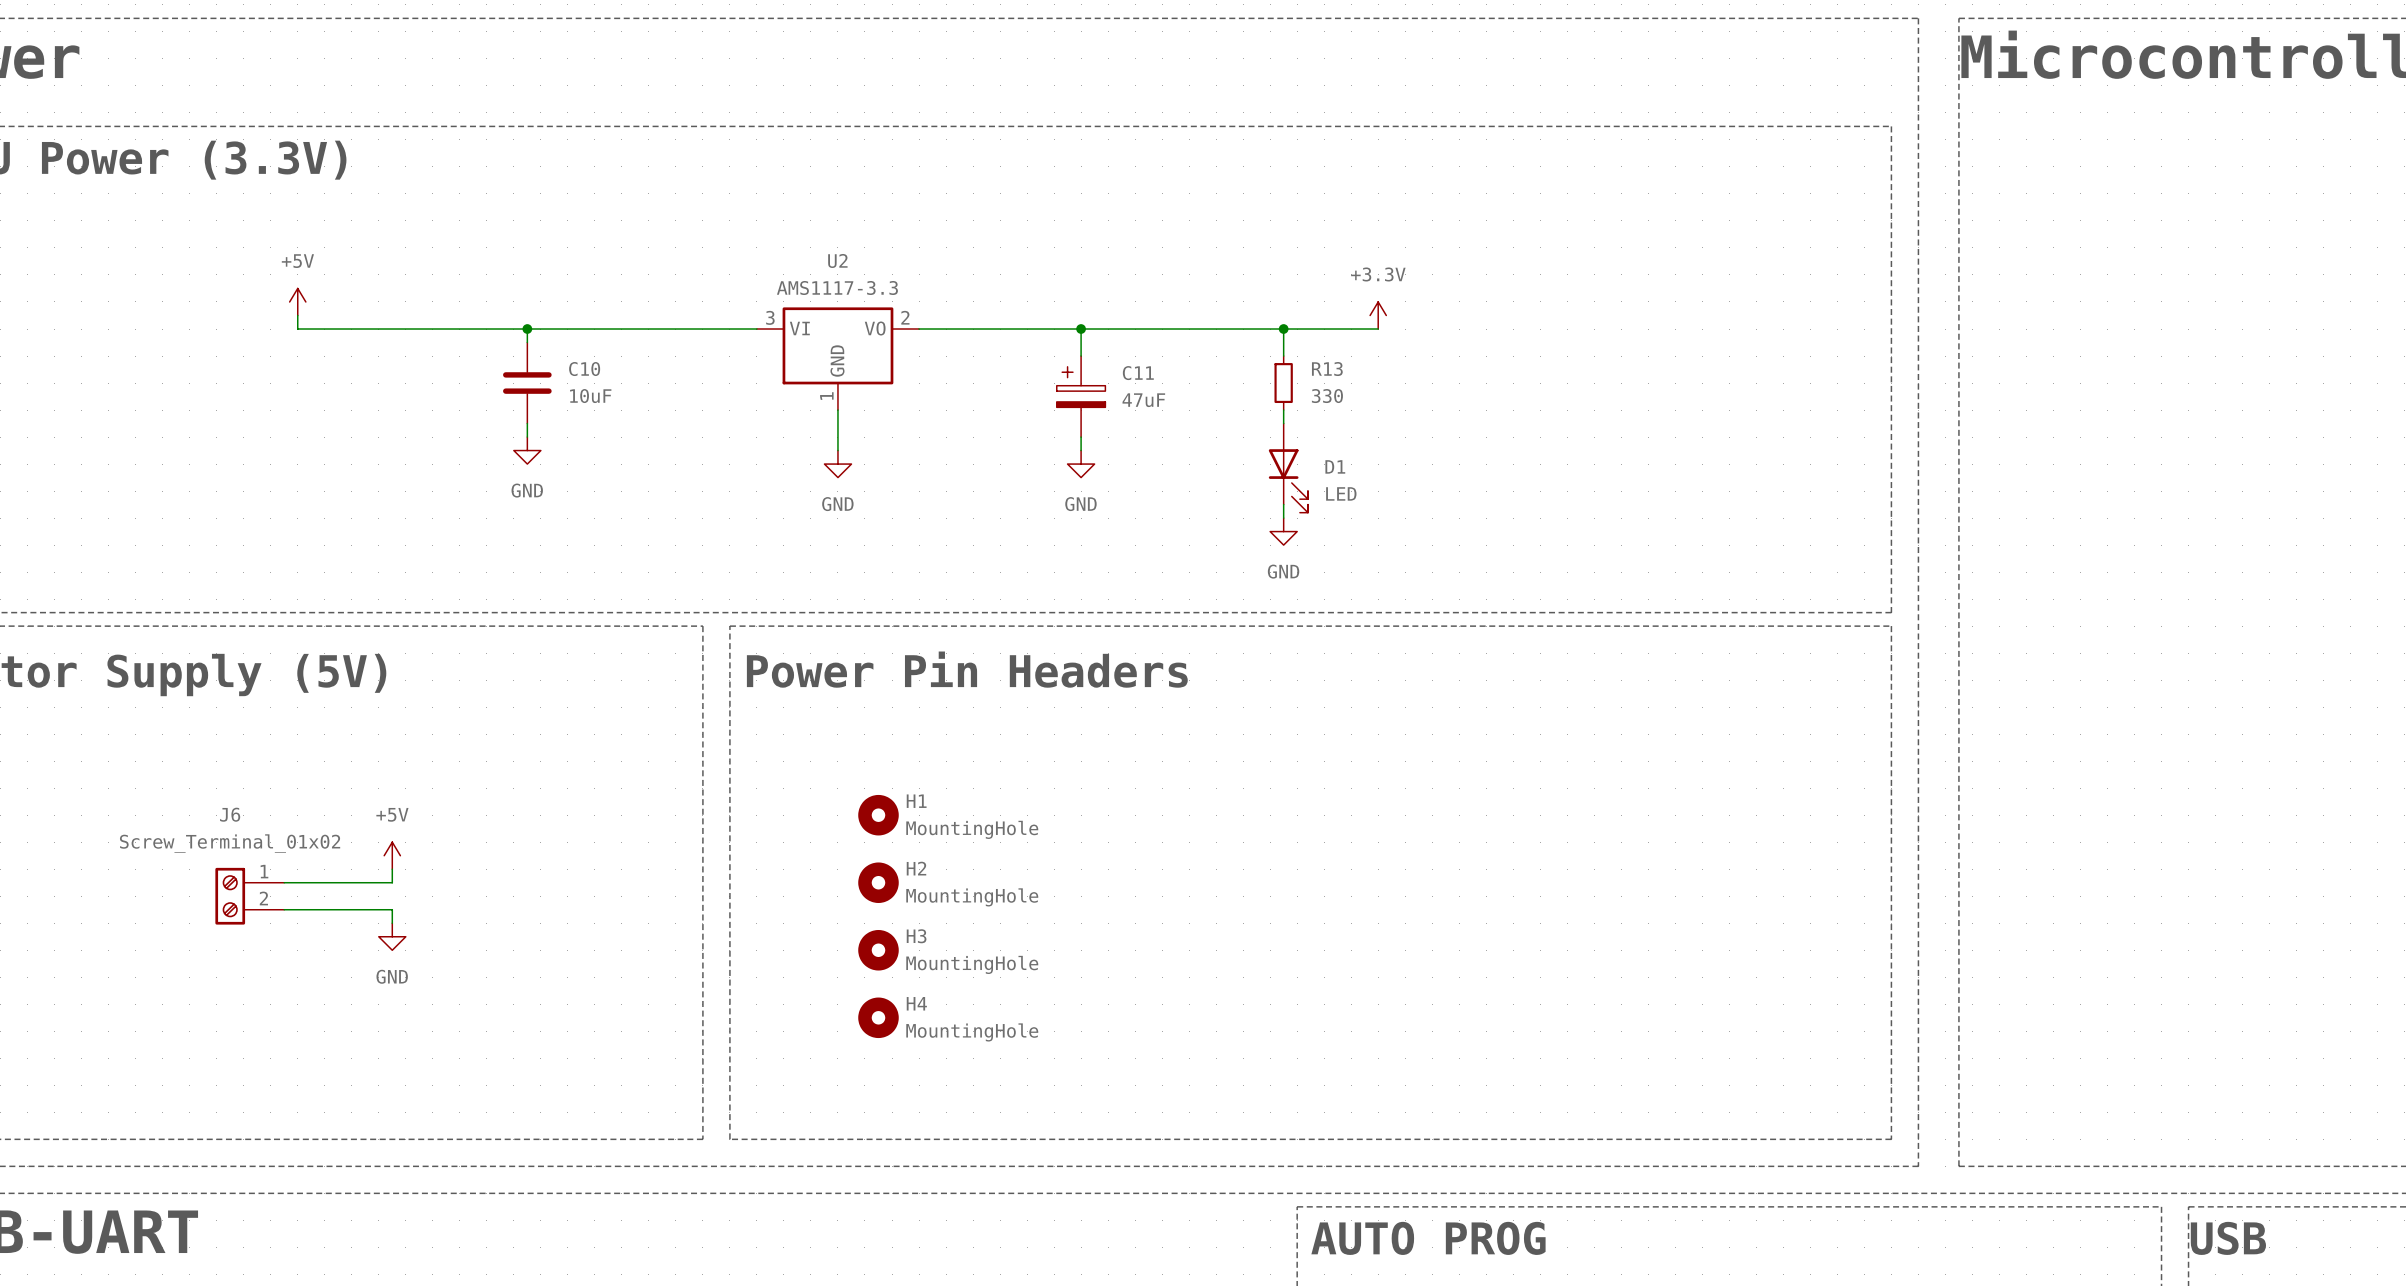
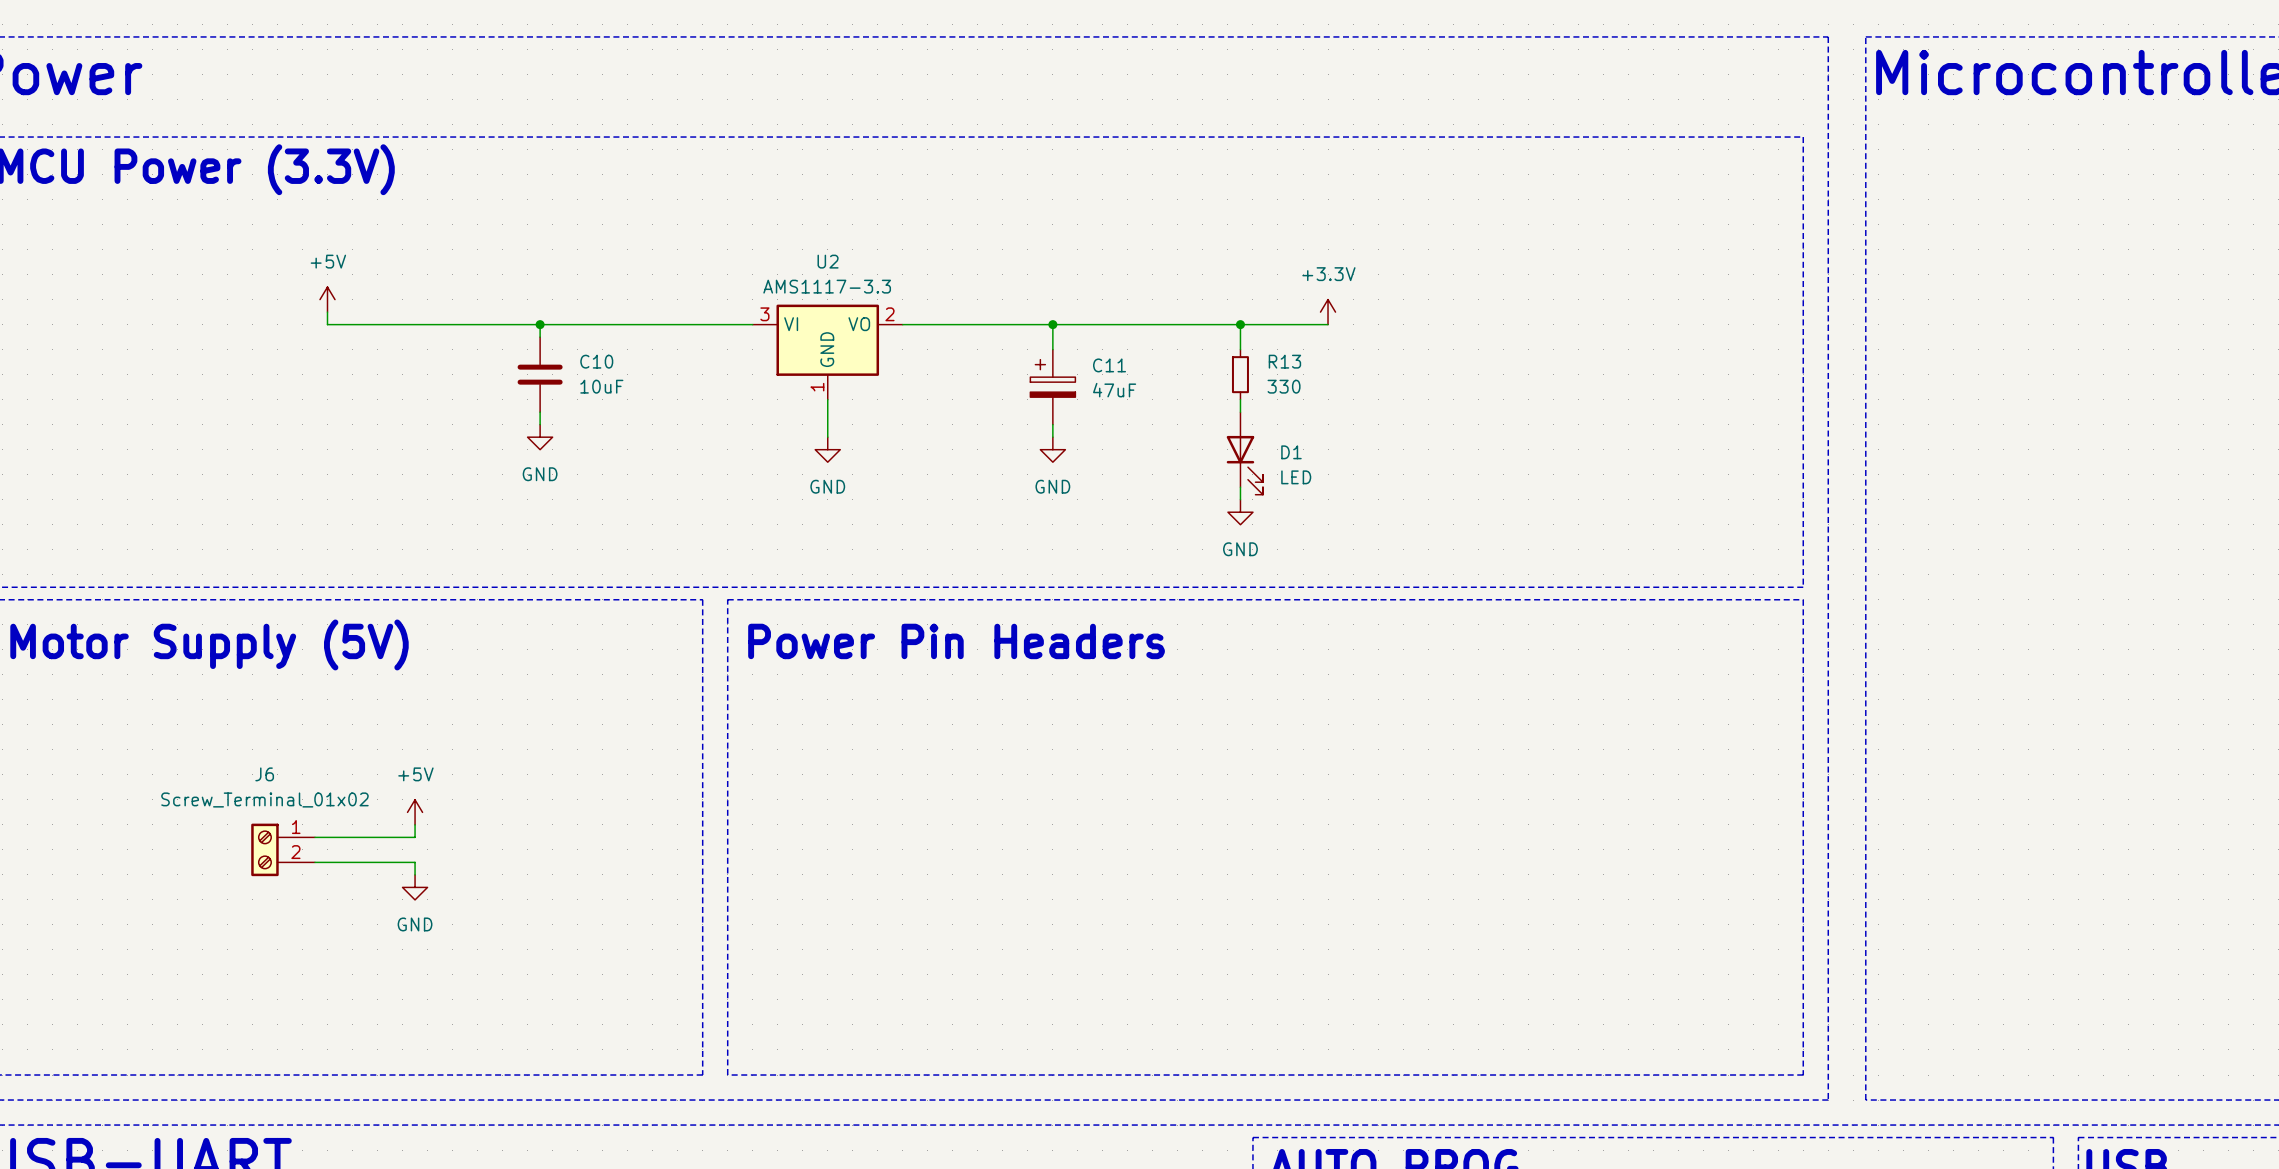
H1: MountingHole (878, 815) -> none
H2: MountingHole (878, 882) -> none
H3: MountingHole (878, 950) -> none
H4: MountingHole (878, 1017) -> none

